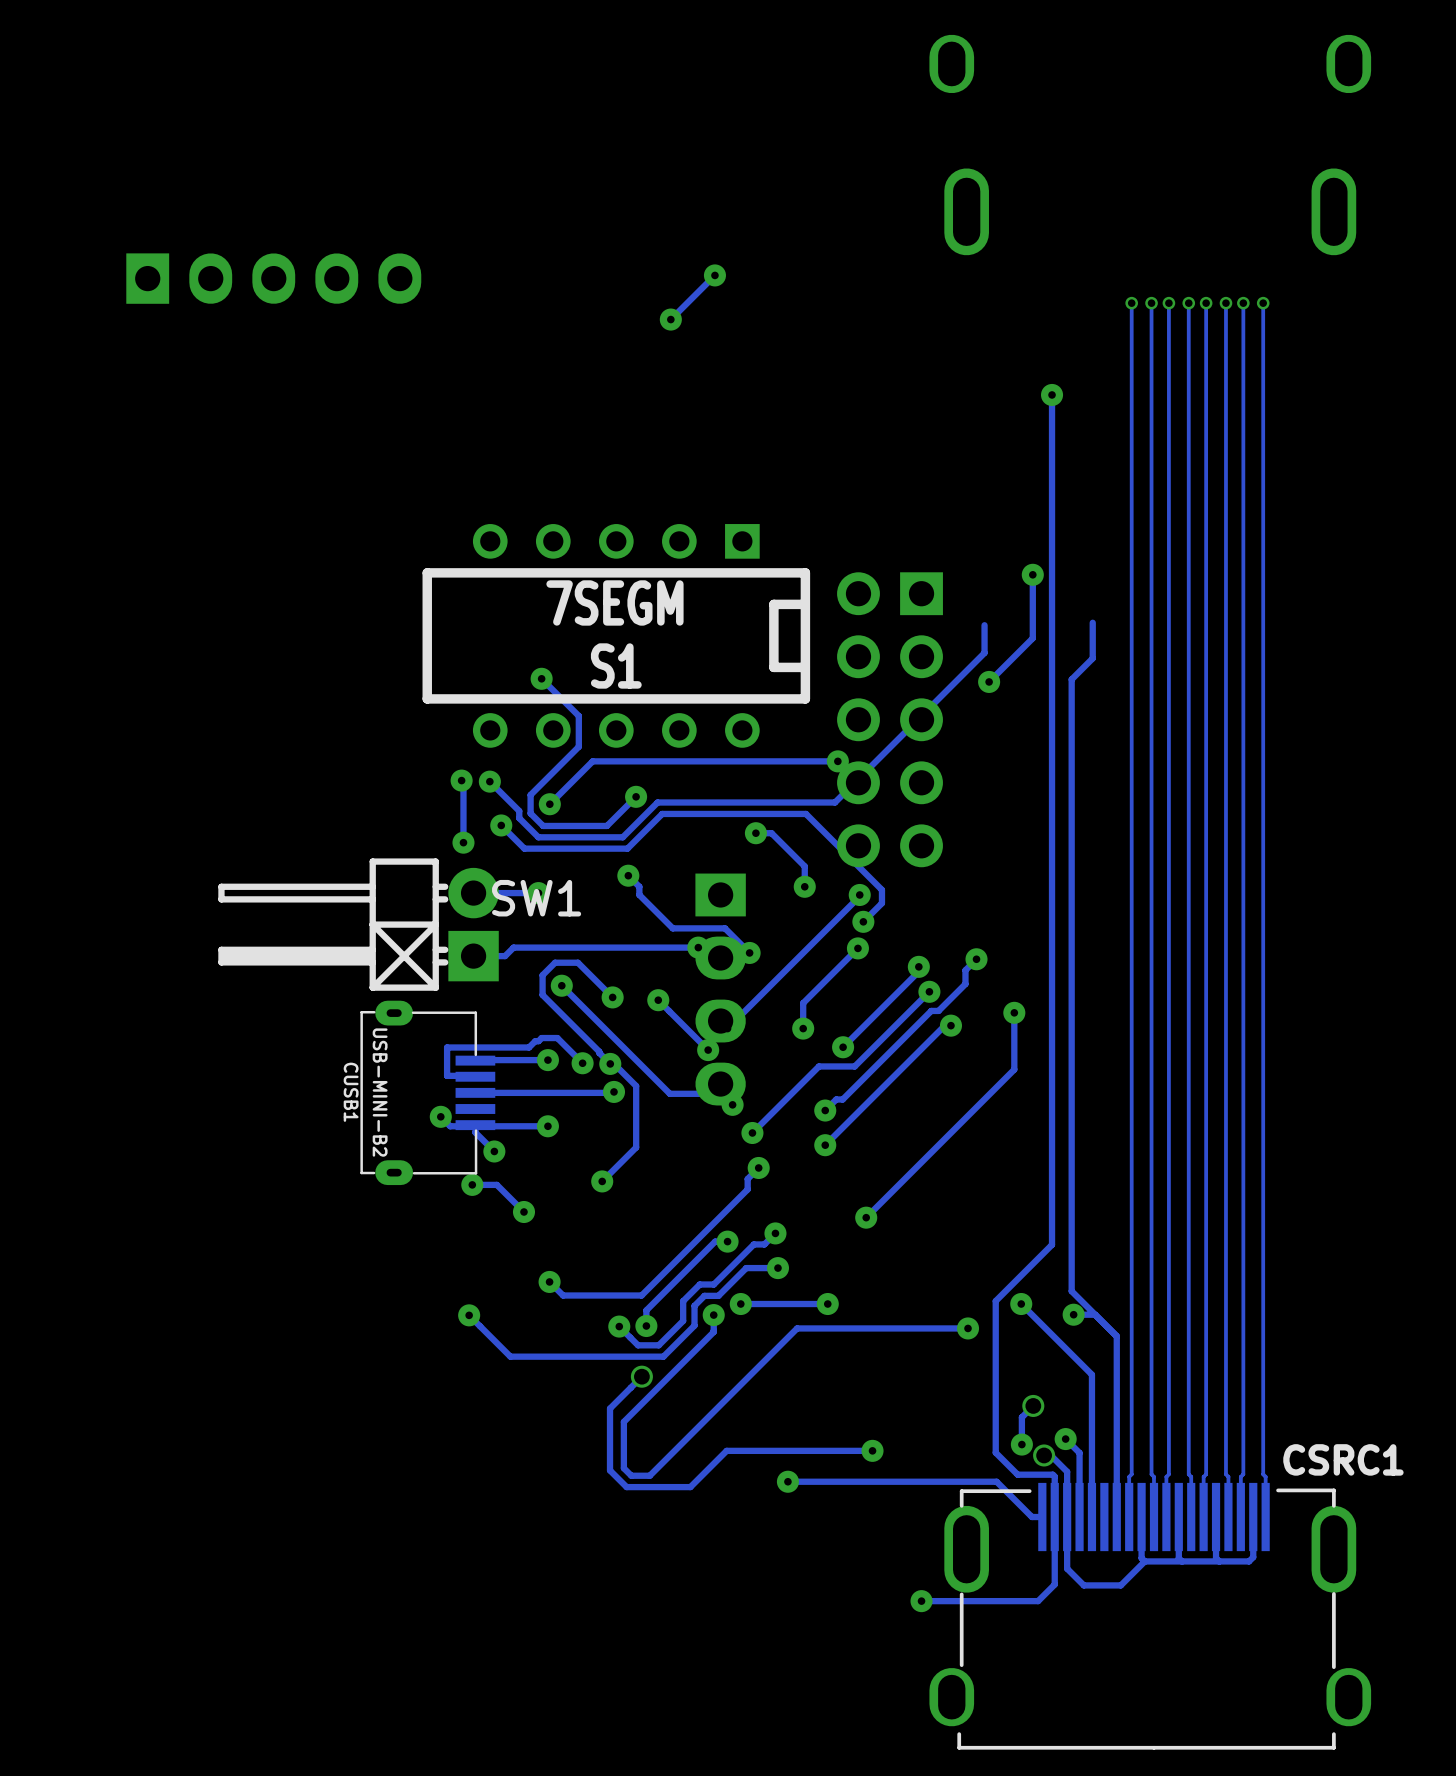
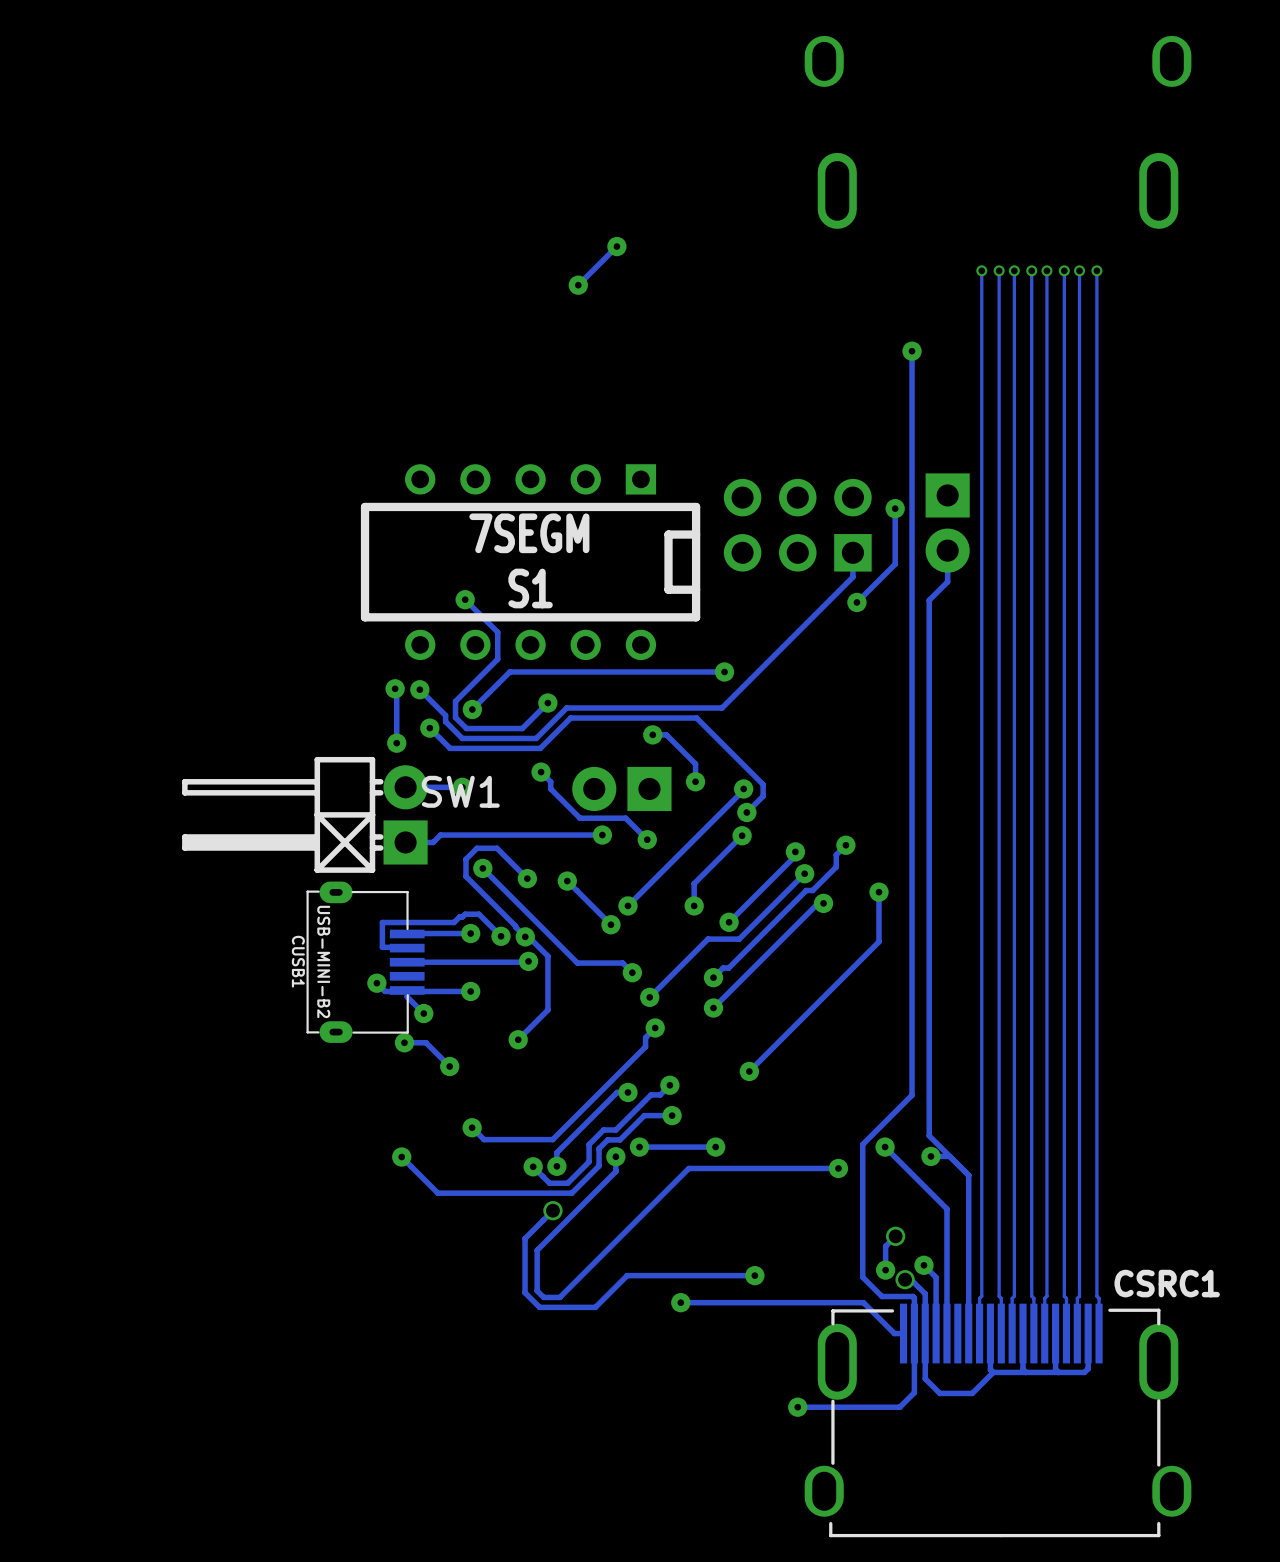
part: (273, 278) -> none
part: none -> (947, 523)
part: none -> (797, 525)
part: (890, 719) -> none
part: none -> (621, 788)
part: (720, 989) -> none

